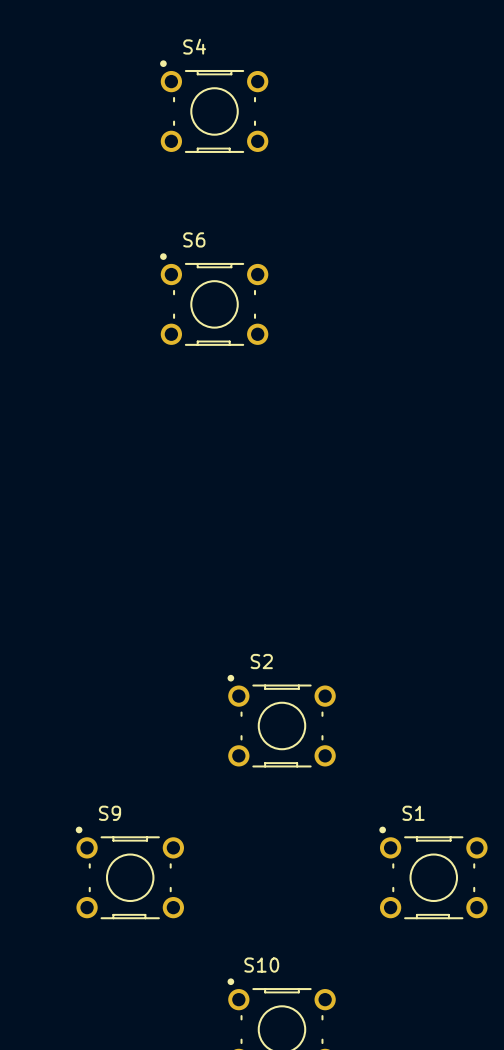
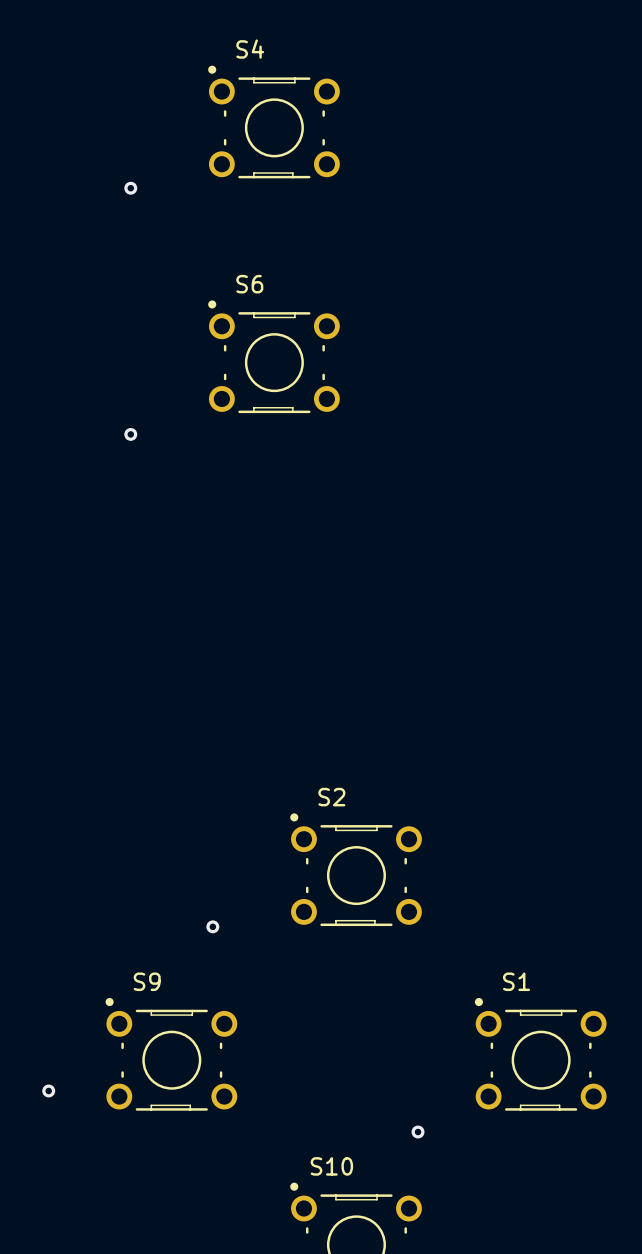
via: none -> (130, 188)
via: none -> (130, 434)
via: none -> (212, 926)
via: none -> (48, 1090)
via: none -> (418, 1132)

